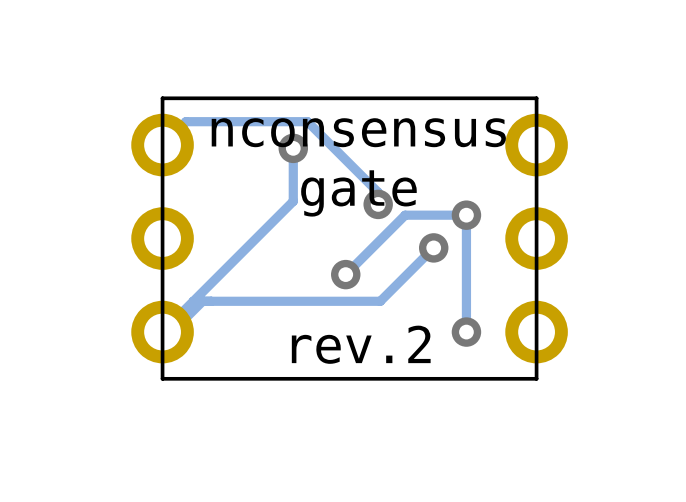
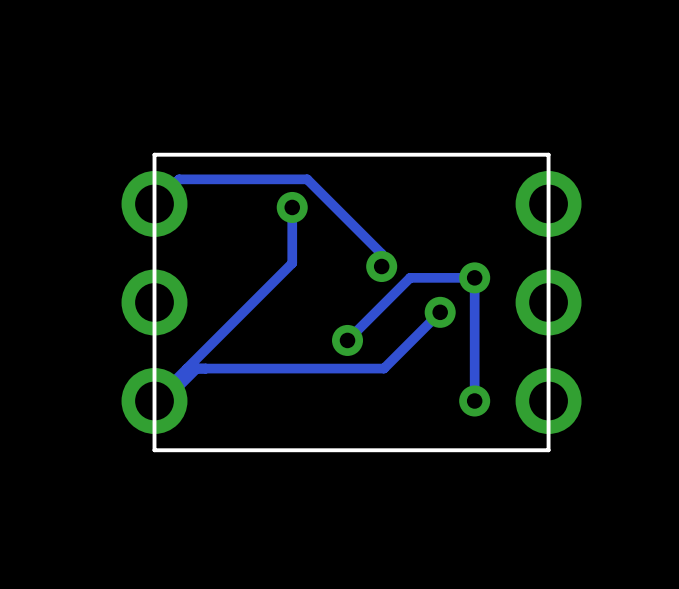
text: nconsensus (358, 132) -> none
text: gate (358, 193) -> none
text: rev.2 (361, 344) -> none

